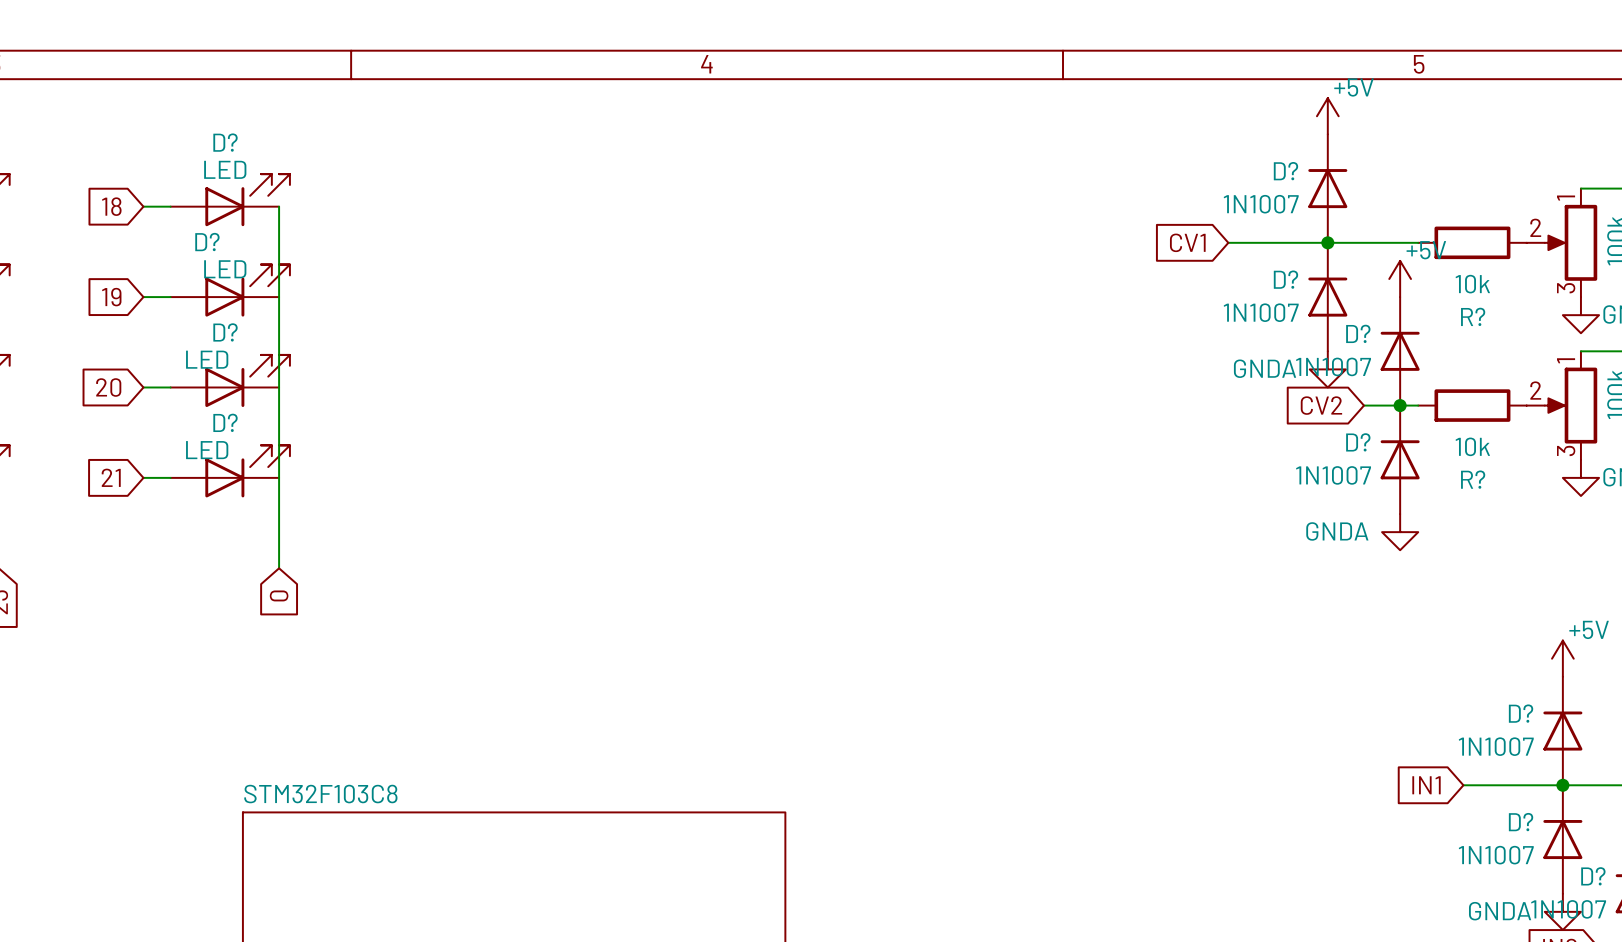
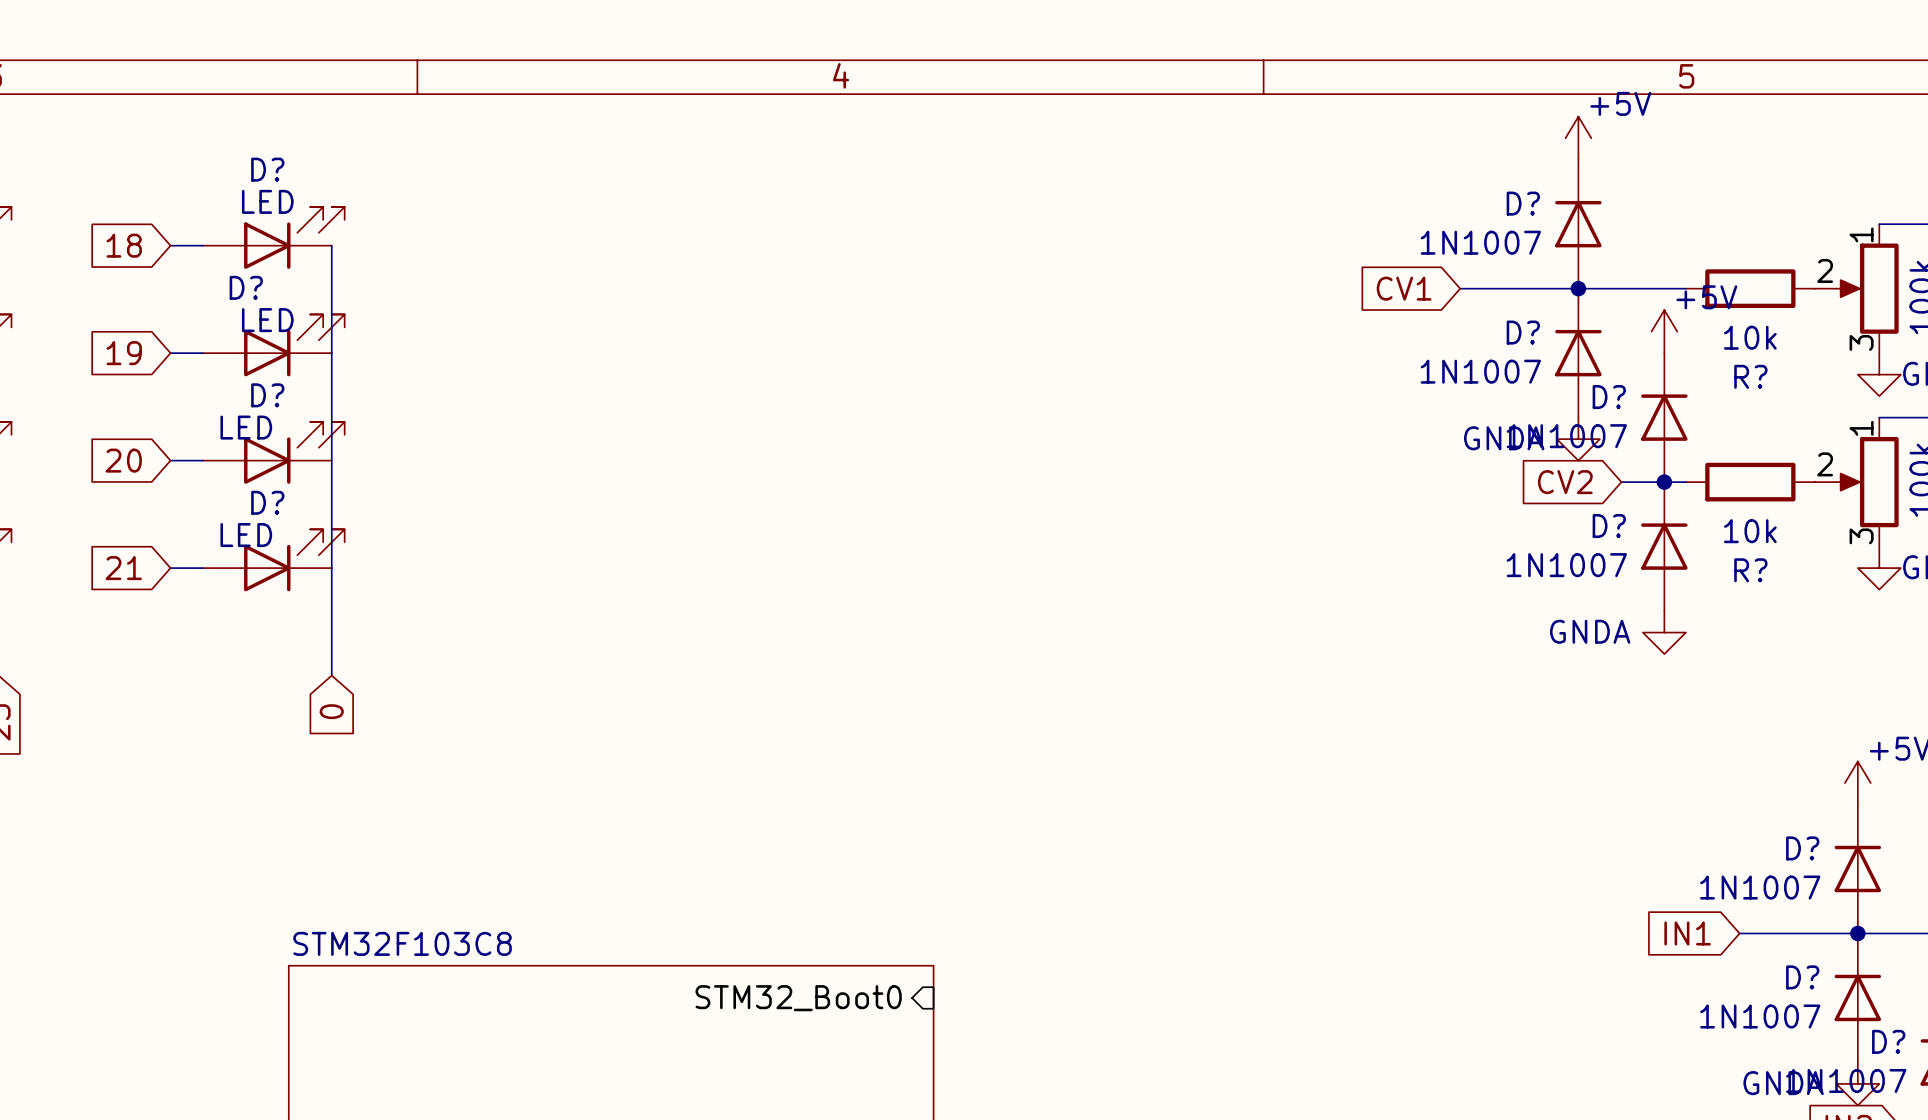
sheet pin: none -> STM32_Boot0 (798, 998)

